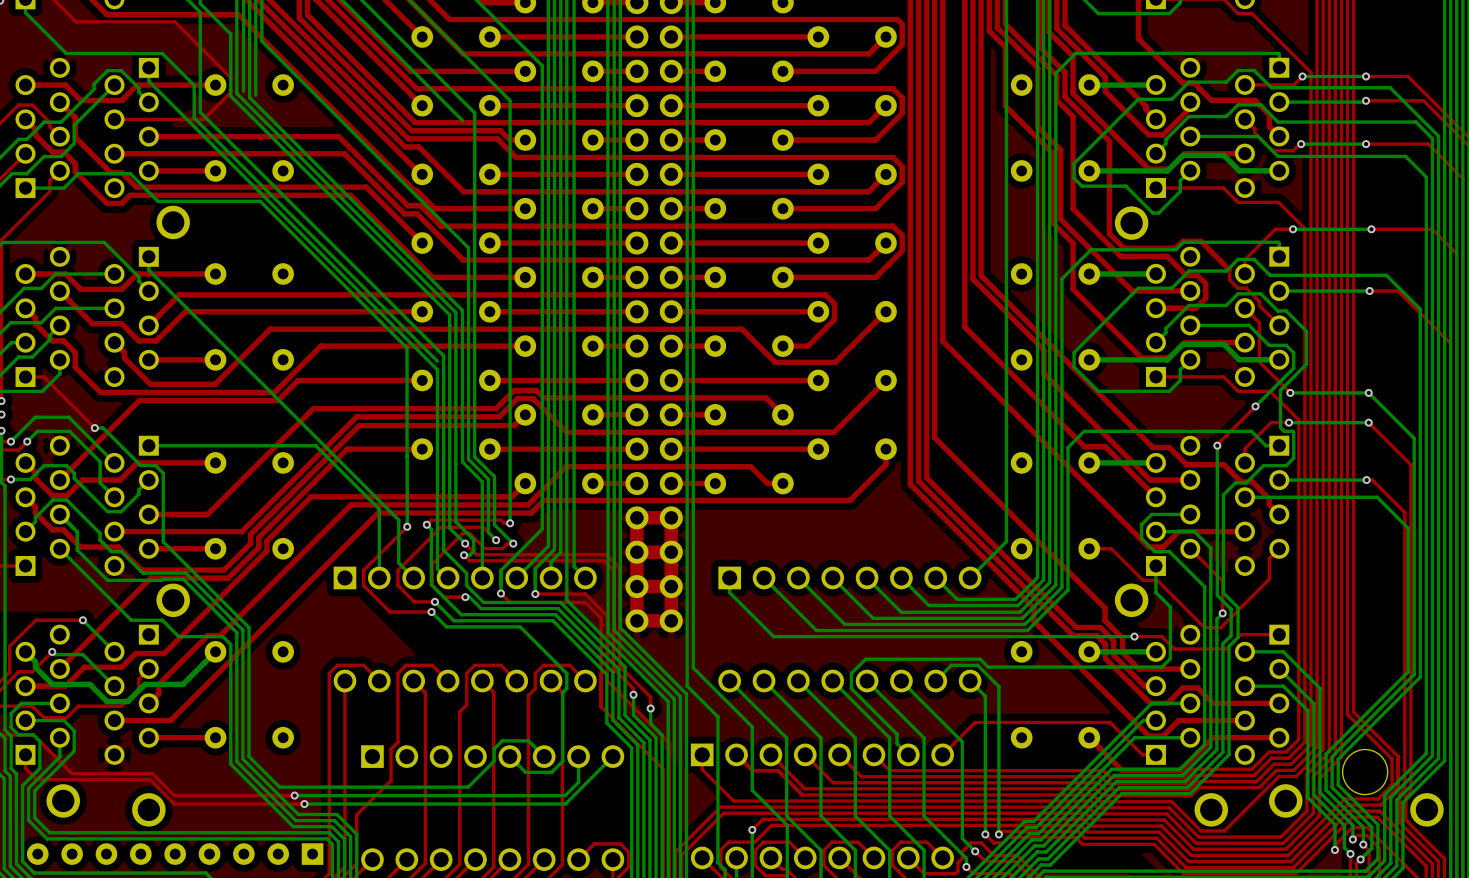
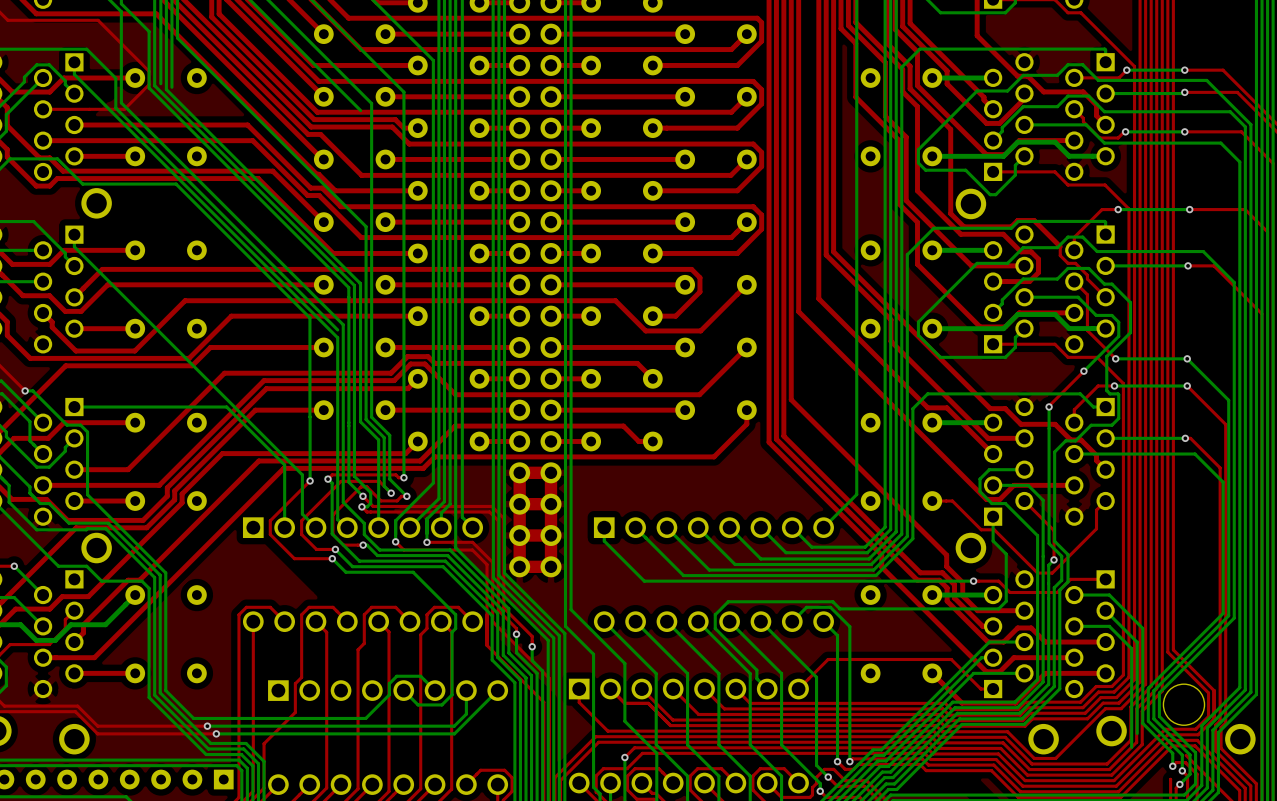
bottom track: (1313, 795) (1344, 825) (1344, 847) (1350, 853) -> (1137, 725) (1137, 733)
bottom track: (1307, 797) (1334, 824) (1334, 850) -> (1131, 727) (1131, 747)
top track: (1367, 827) (1352, 827) (1334, 844) (1334, 850) -> none
via: (1334, 850) -> none
via: (1350, 853) -> none

